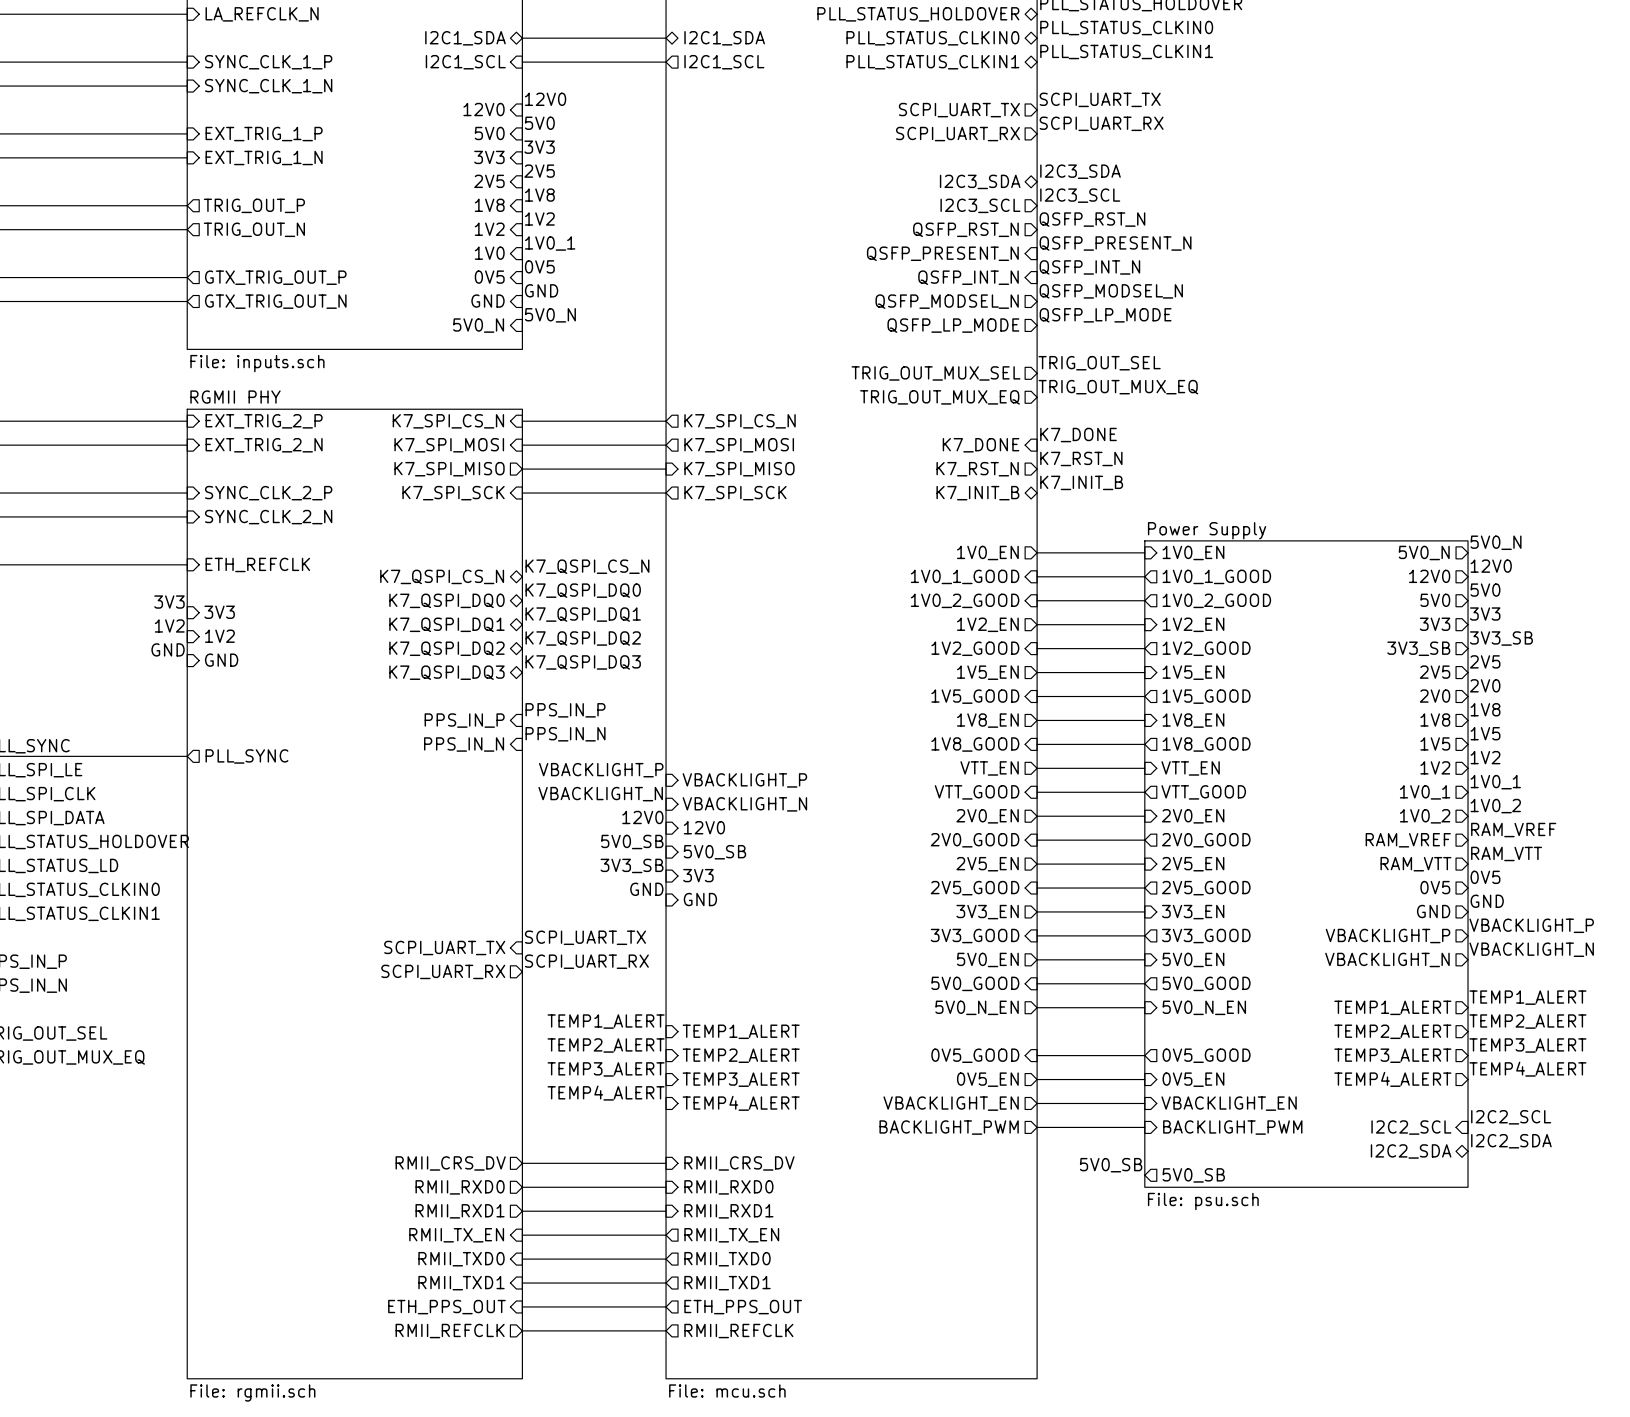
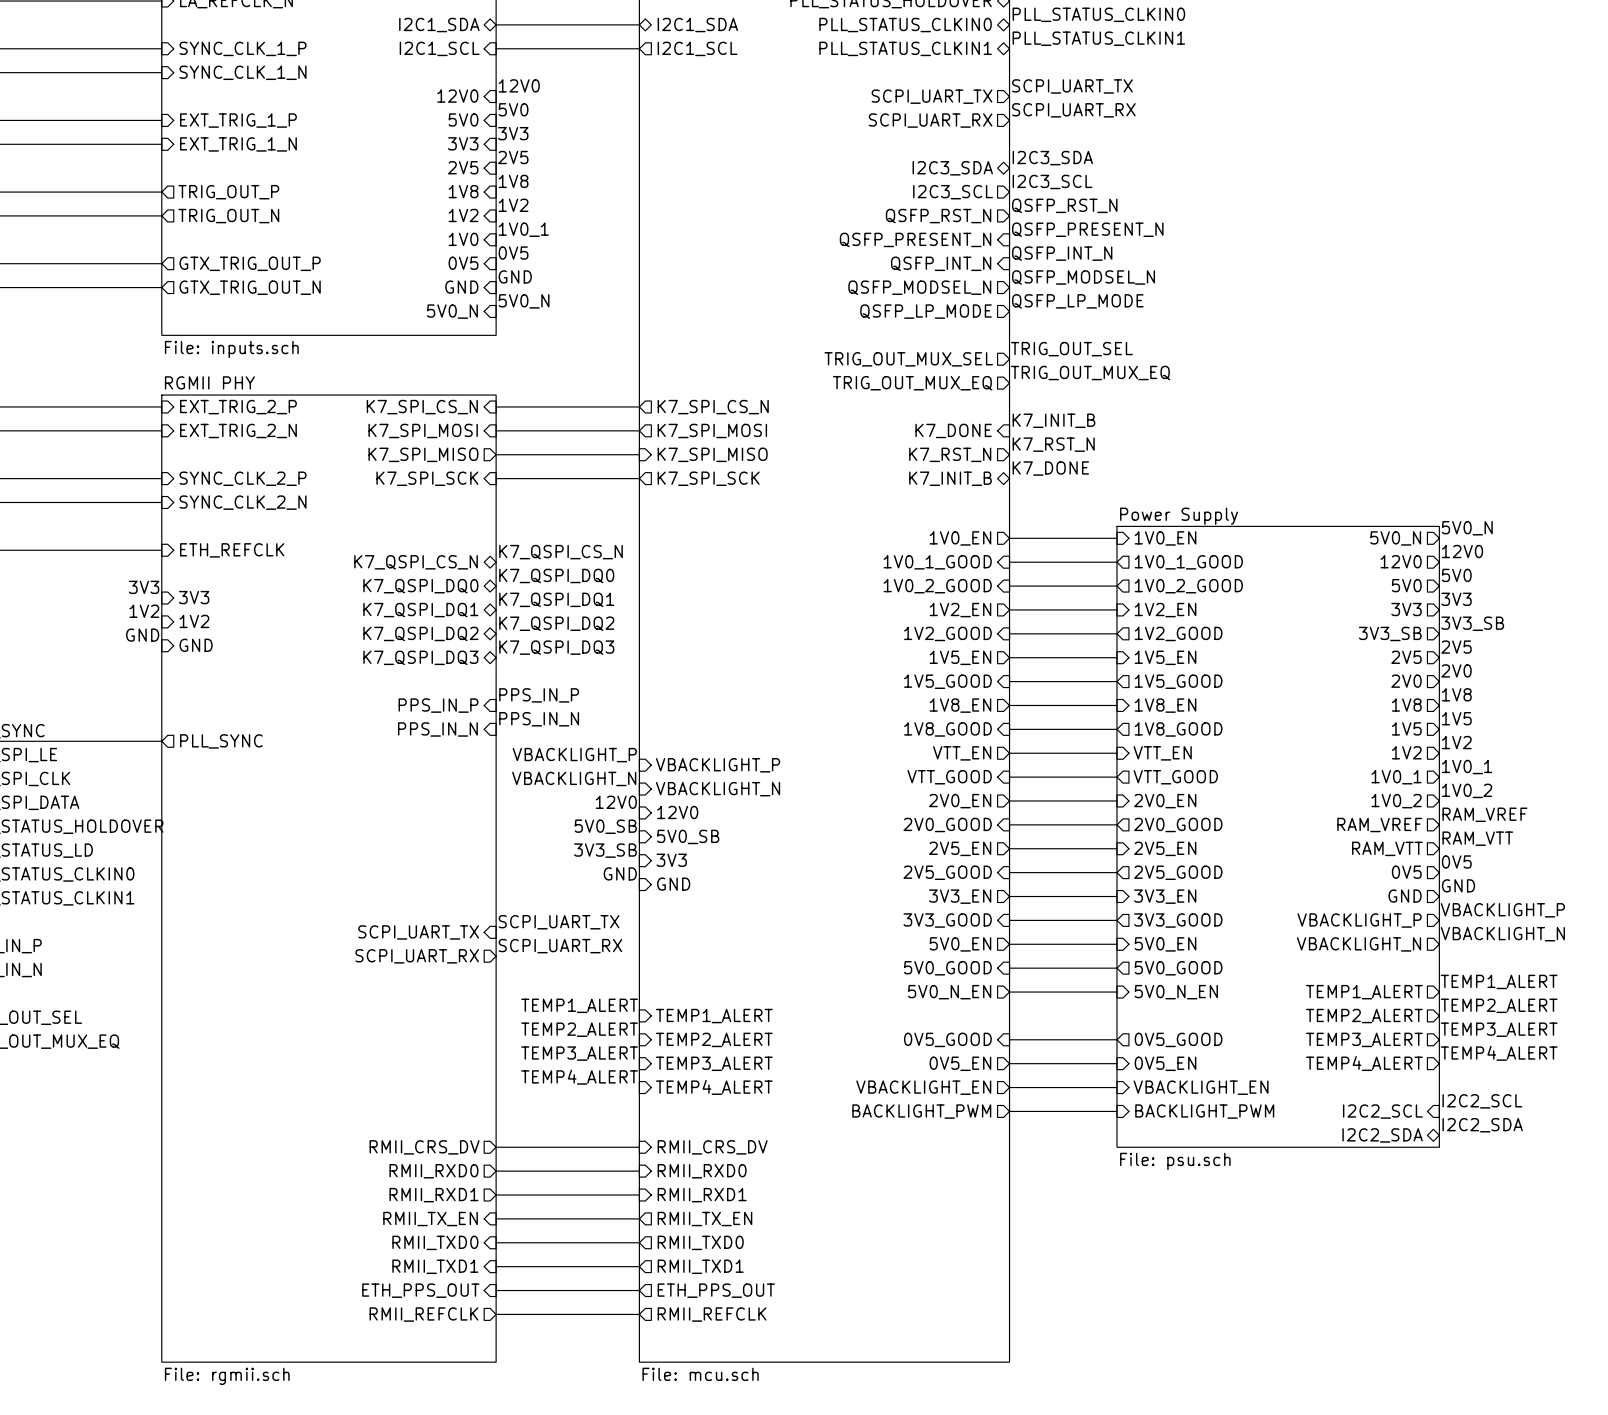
label: K7_DONE (1078, 435) -> K7_INIT_B (1053, 420)
label: K7_INIT_B (1081, 482) -> K7_DONE (1050, 468)
sheet Power Supply: none -> File: psu.sch (1278, 836)
sheet Power Supply: File: psu.sch (1306, 864) -> none
label: 5V0_SB (1111, 1165) -> none
sheet pin: 5V0_SB (1193, 1175) -> none

